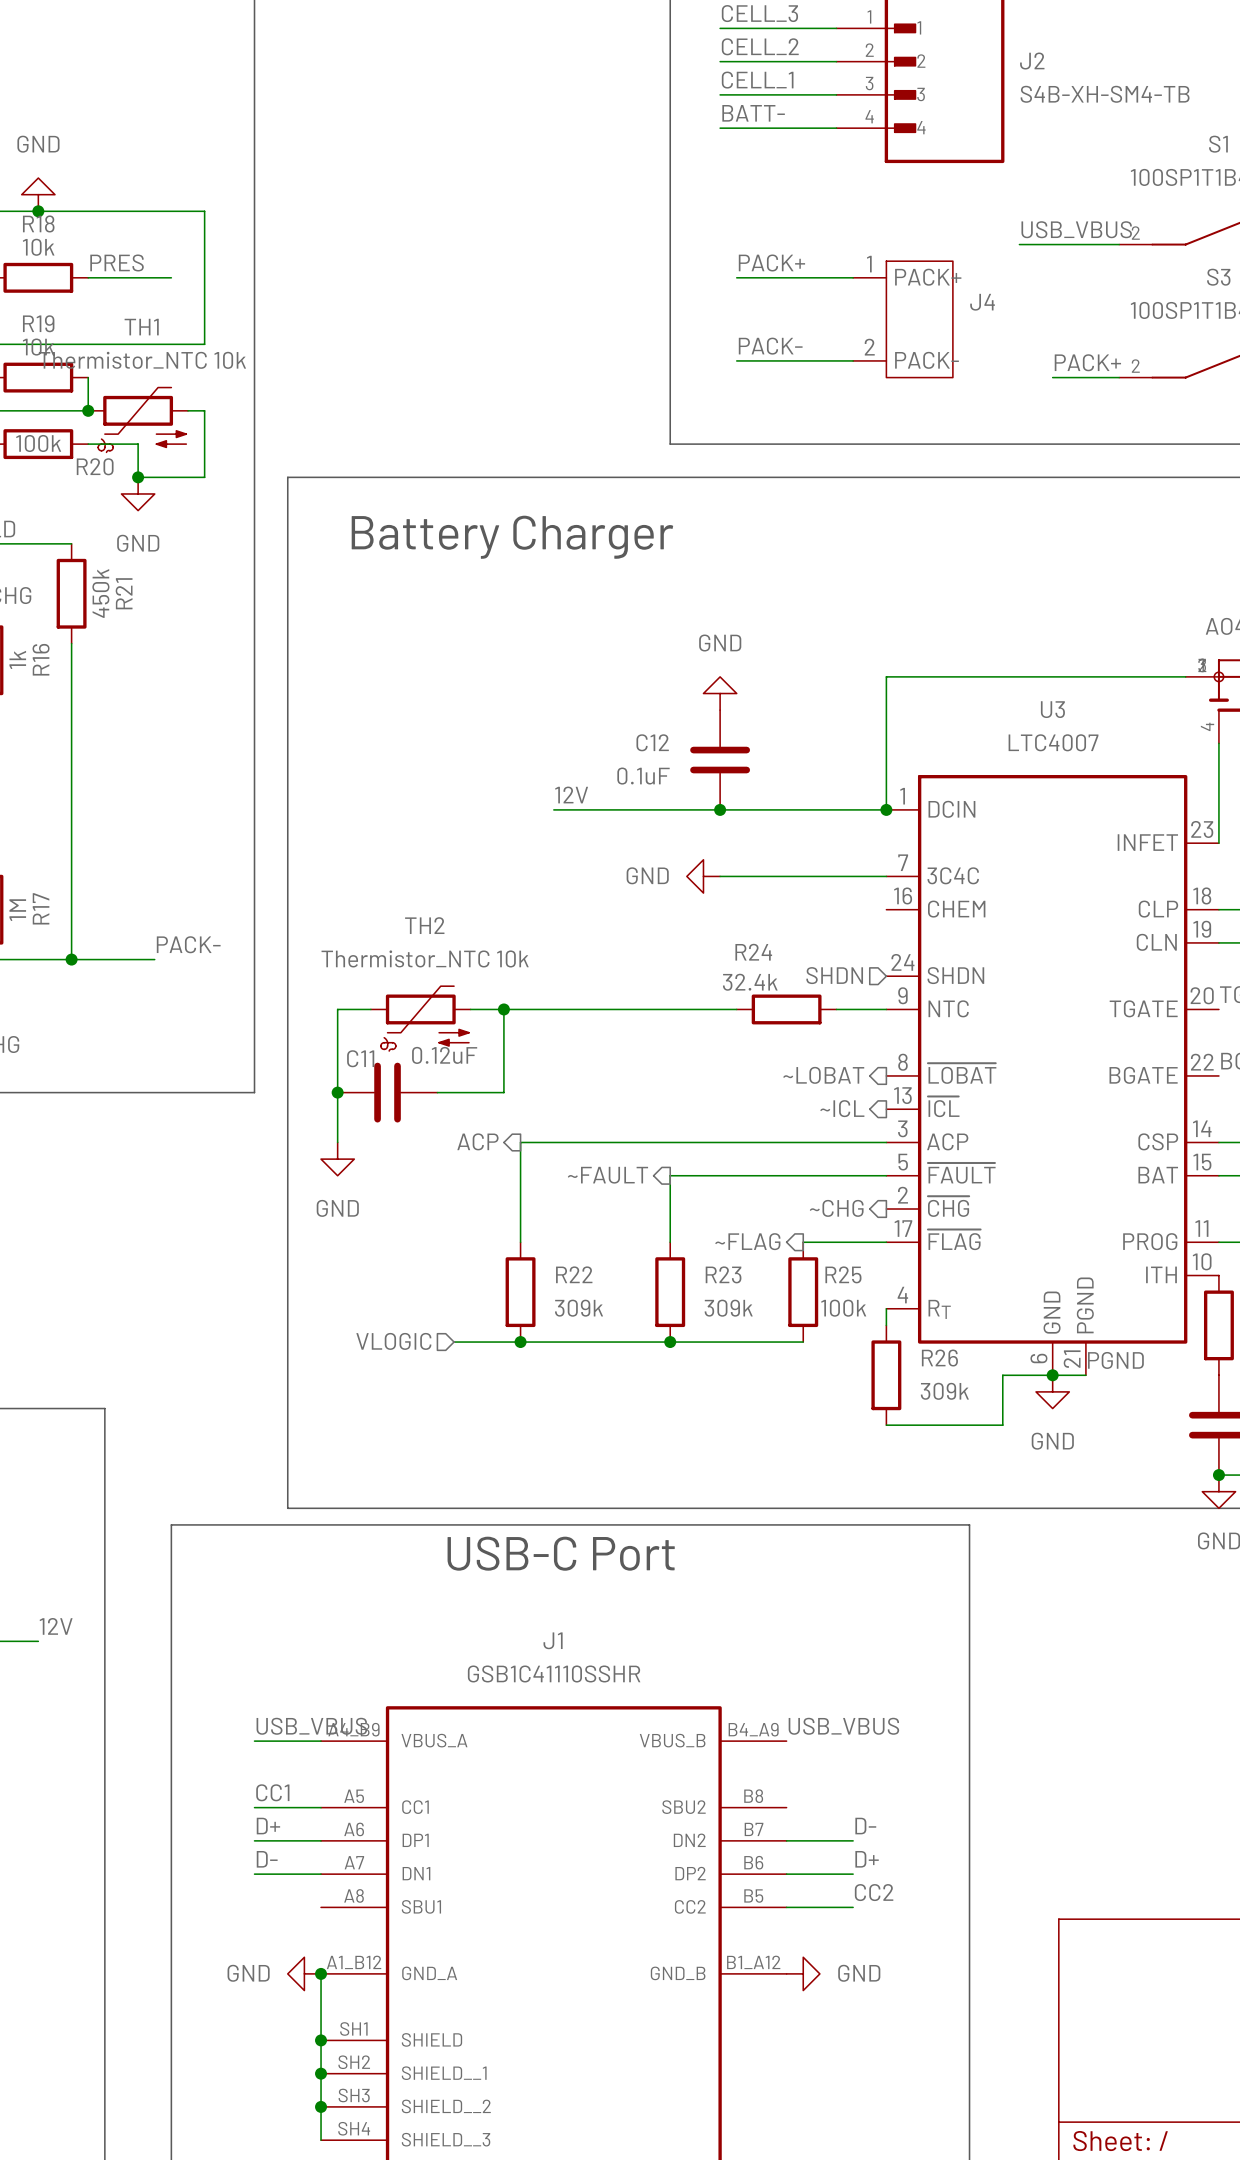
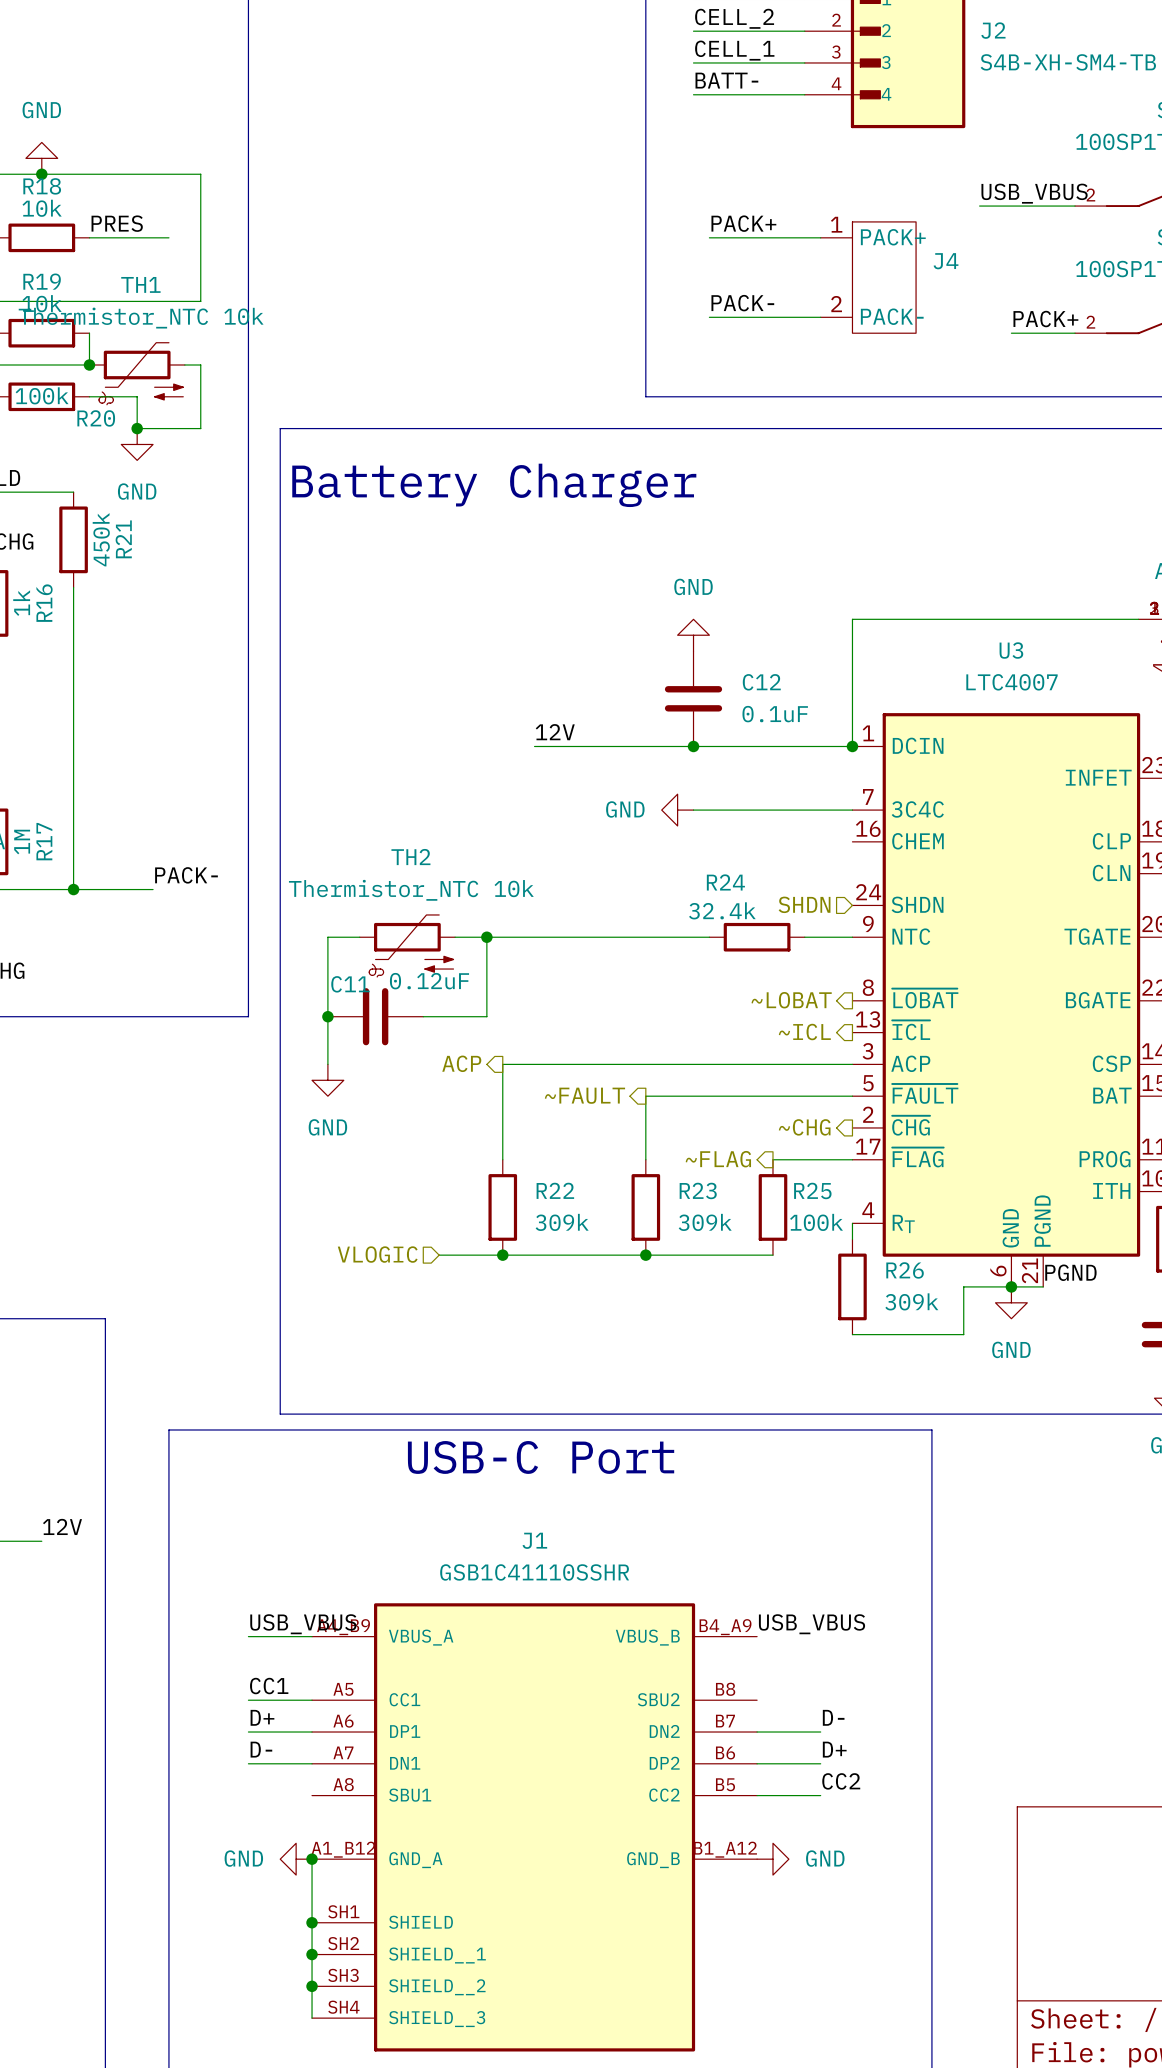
C12 name position: C12 (652, 742) -> C12 (761, 682)
C12 value position: 0.1uF (643, 776) -> 0.1uF (775, 714)

